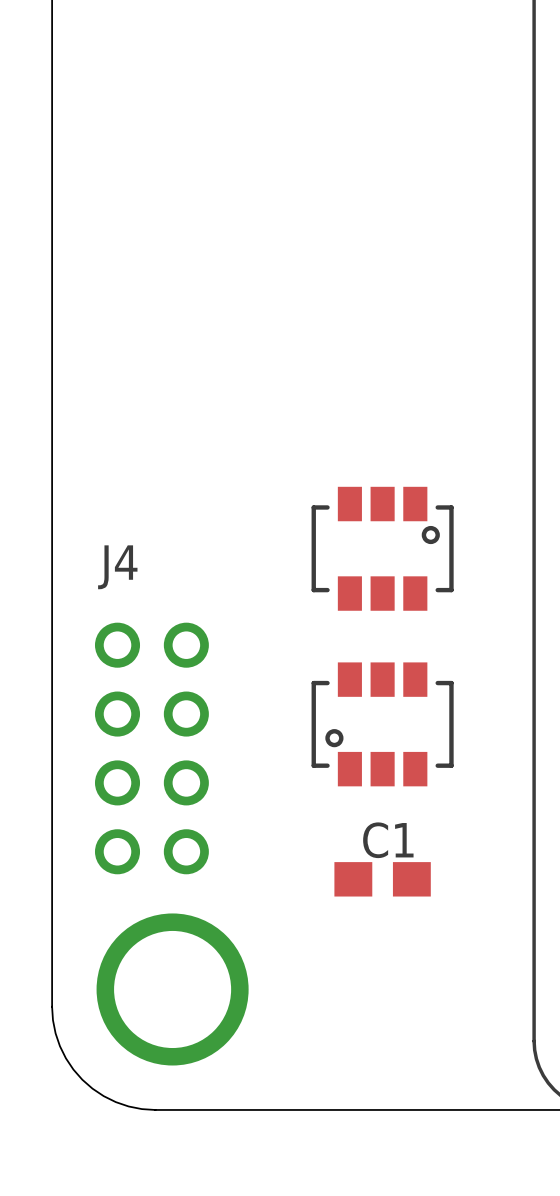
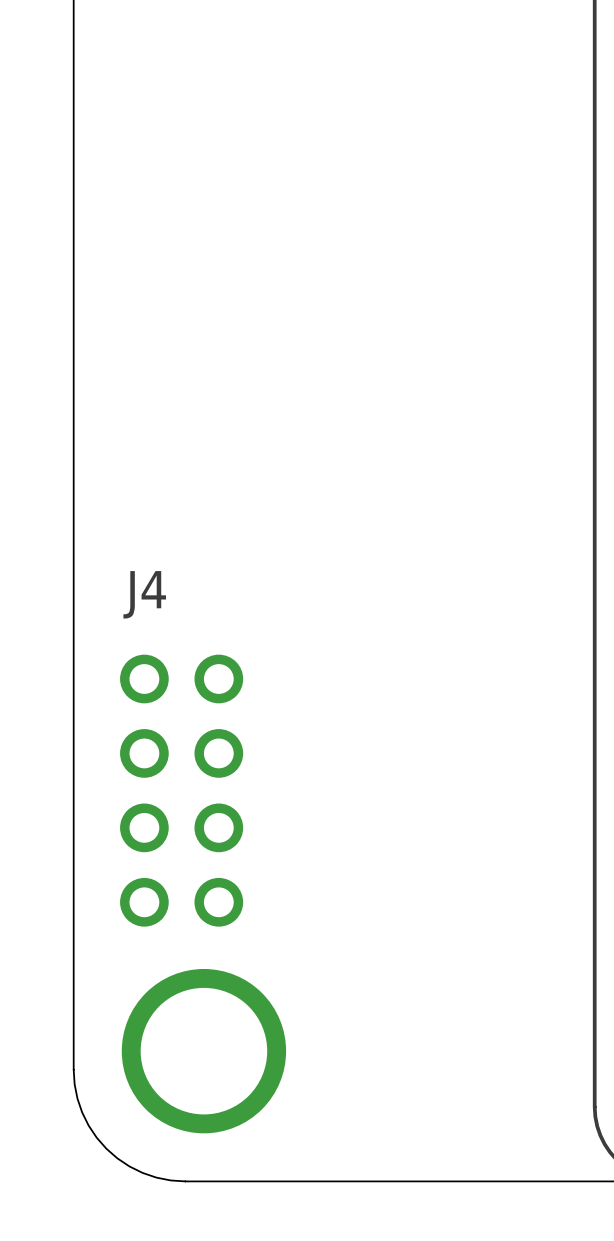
part: (382, 548) -> none
part: (382, 724) -> none
C1: (382, 879) -> none

